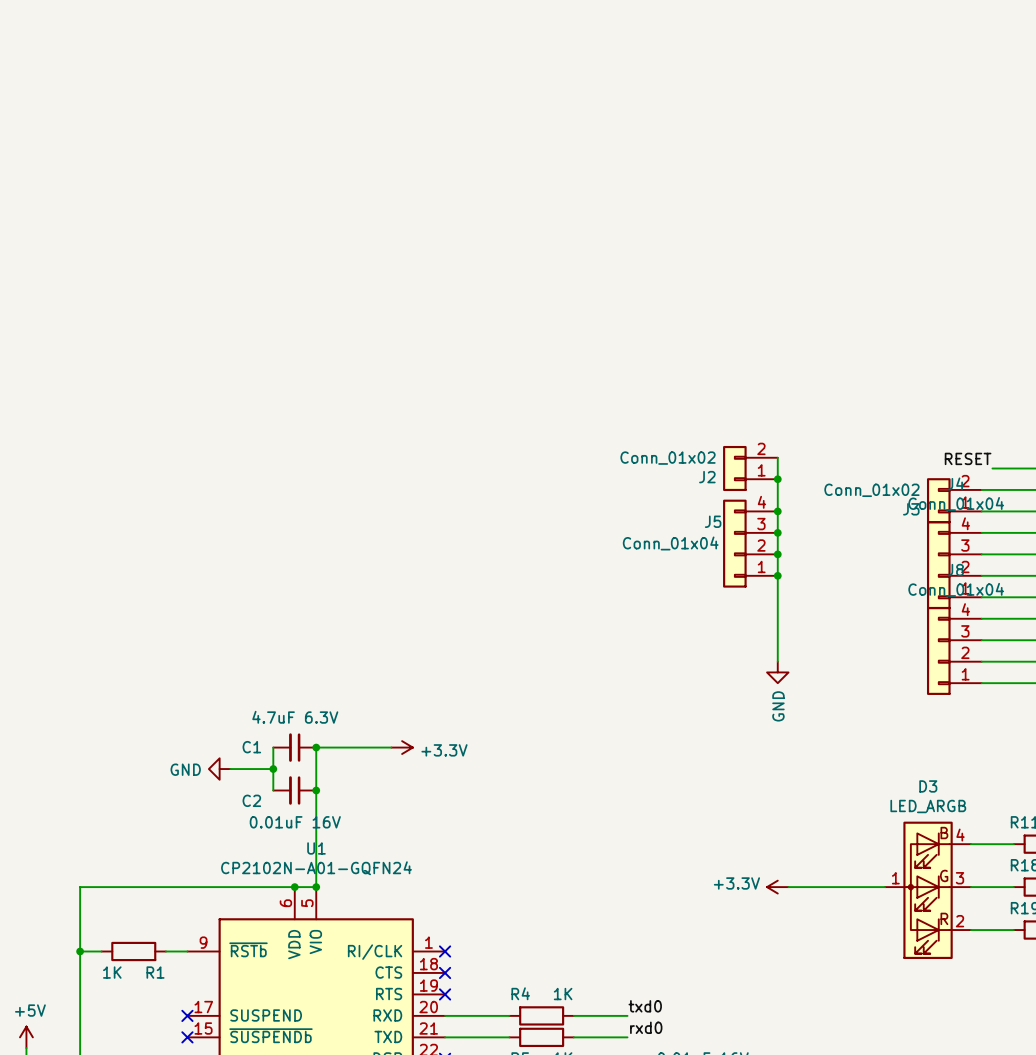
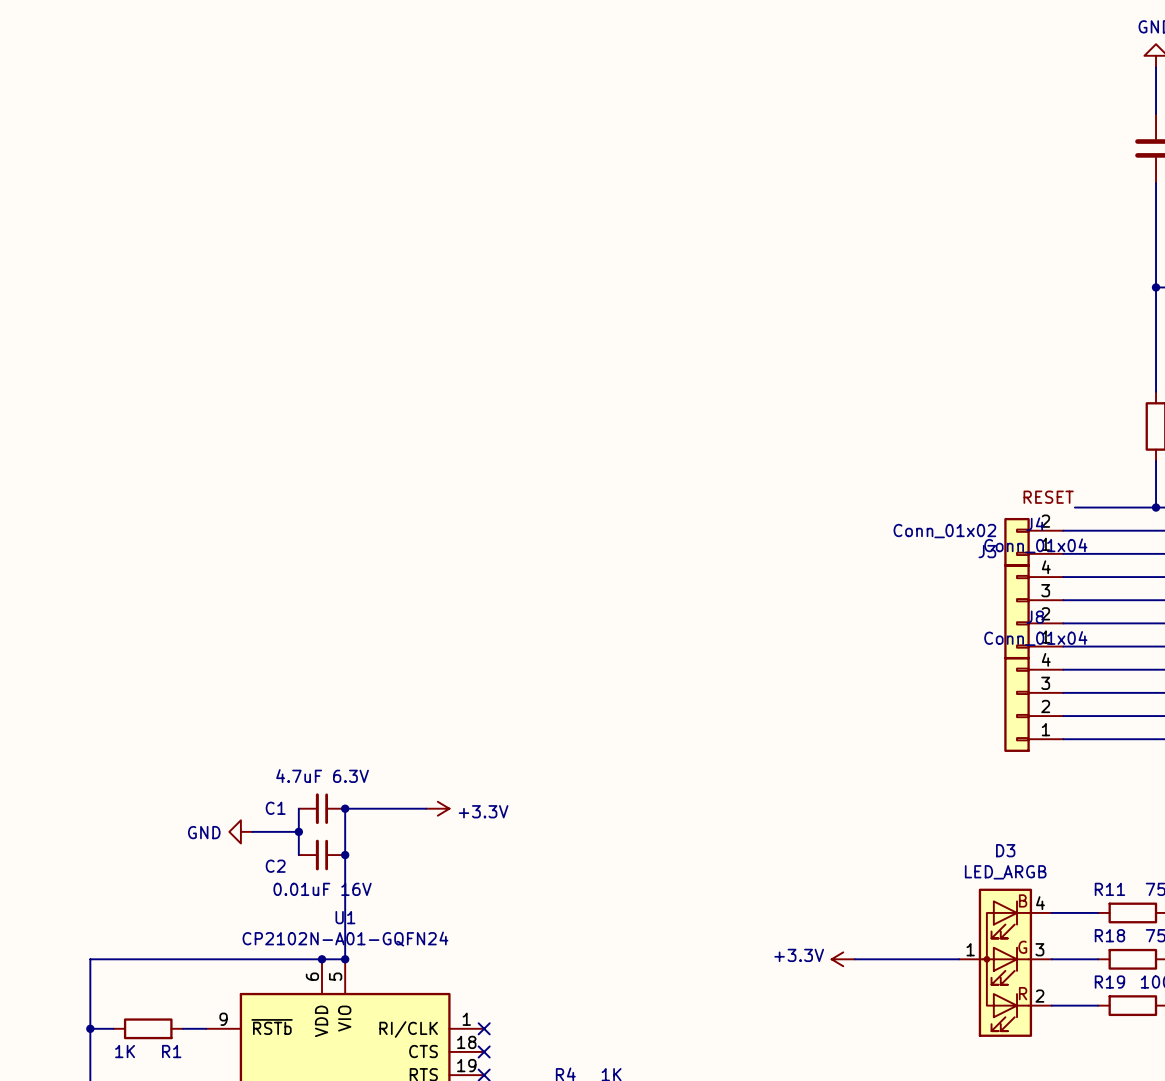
wire: (777, 457) (777, 661) -> none
J2: Conn_01x02 (750, 468) -> none
junction: (777, 479) -> none
junction: (777, 511) -> none
junction: (777, 532) -> none
J5: Conn_01x04 (750, 543) -> none
junction: (777, 554) -> none
junction: (777, 575) -> none
power symbol: GND (777, 672) -> none

